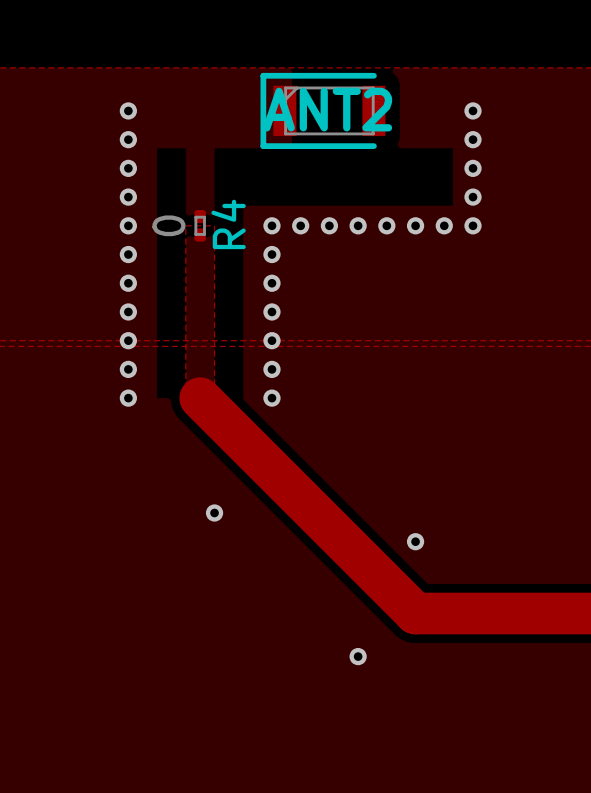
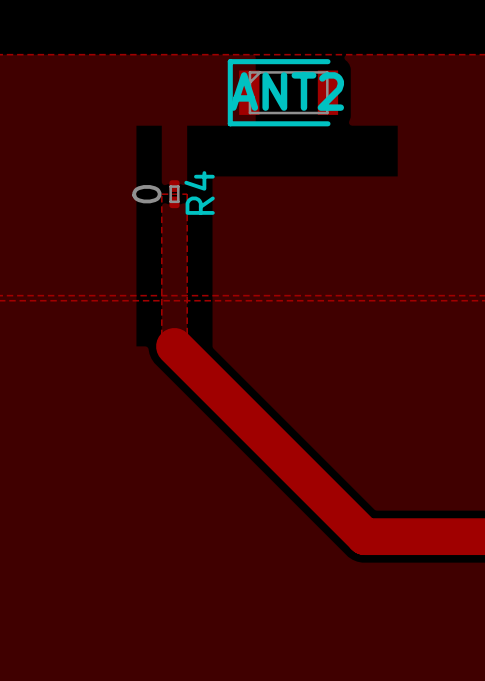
via: (128, 110) -> none
via: (473, 110) -> none
via: (128, 139) -> none
via: (473, 139) -> none
via: (128, 168) -> none
via: (473, 168) -> none
via: (128, 197) -> none
via: (473, 197) -> none
via: (128, 225) -> none
via: (271, 225) -> none
via: (300, 225) -> none
via: (329, 225) -> none
via: (358, 225) -> none
via: (386, 225) -> none
via: (415, 225) -> none
via: (444, 225) -> none
via: (473, 225) -> none
via: (128, 254) -> none
via: (271, 254) -> none
via: (128, 283) -> none
via: (271, 283) -> none
via: (128, 311) -> none
via: (271, 311) -> none
via: (128, 340) -> none
via: (271, 340) -> none
via: (128, 369) -> none
via: (271, 369) -> none
via: (128, 398) -> none
via: (271, 398) -> none
via: (214, 512) -> none
via: (415, 541) -> none
via: (358, 656) -> none

